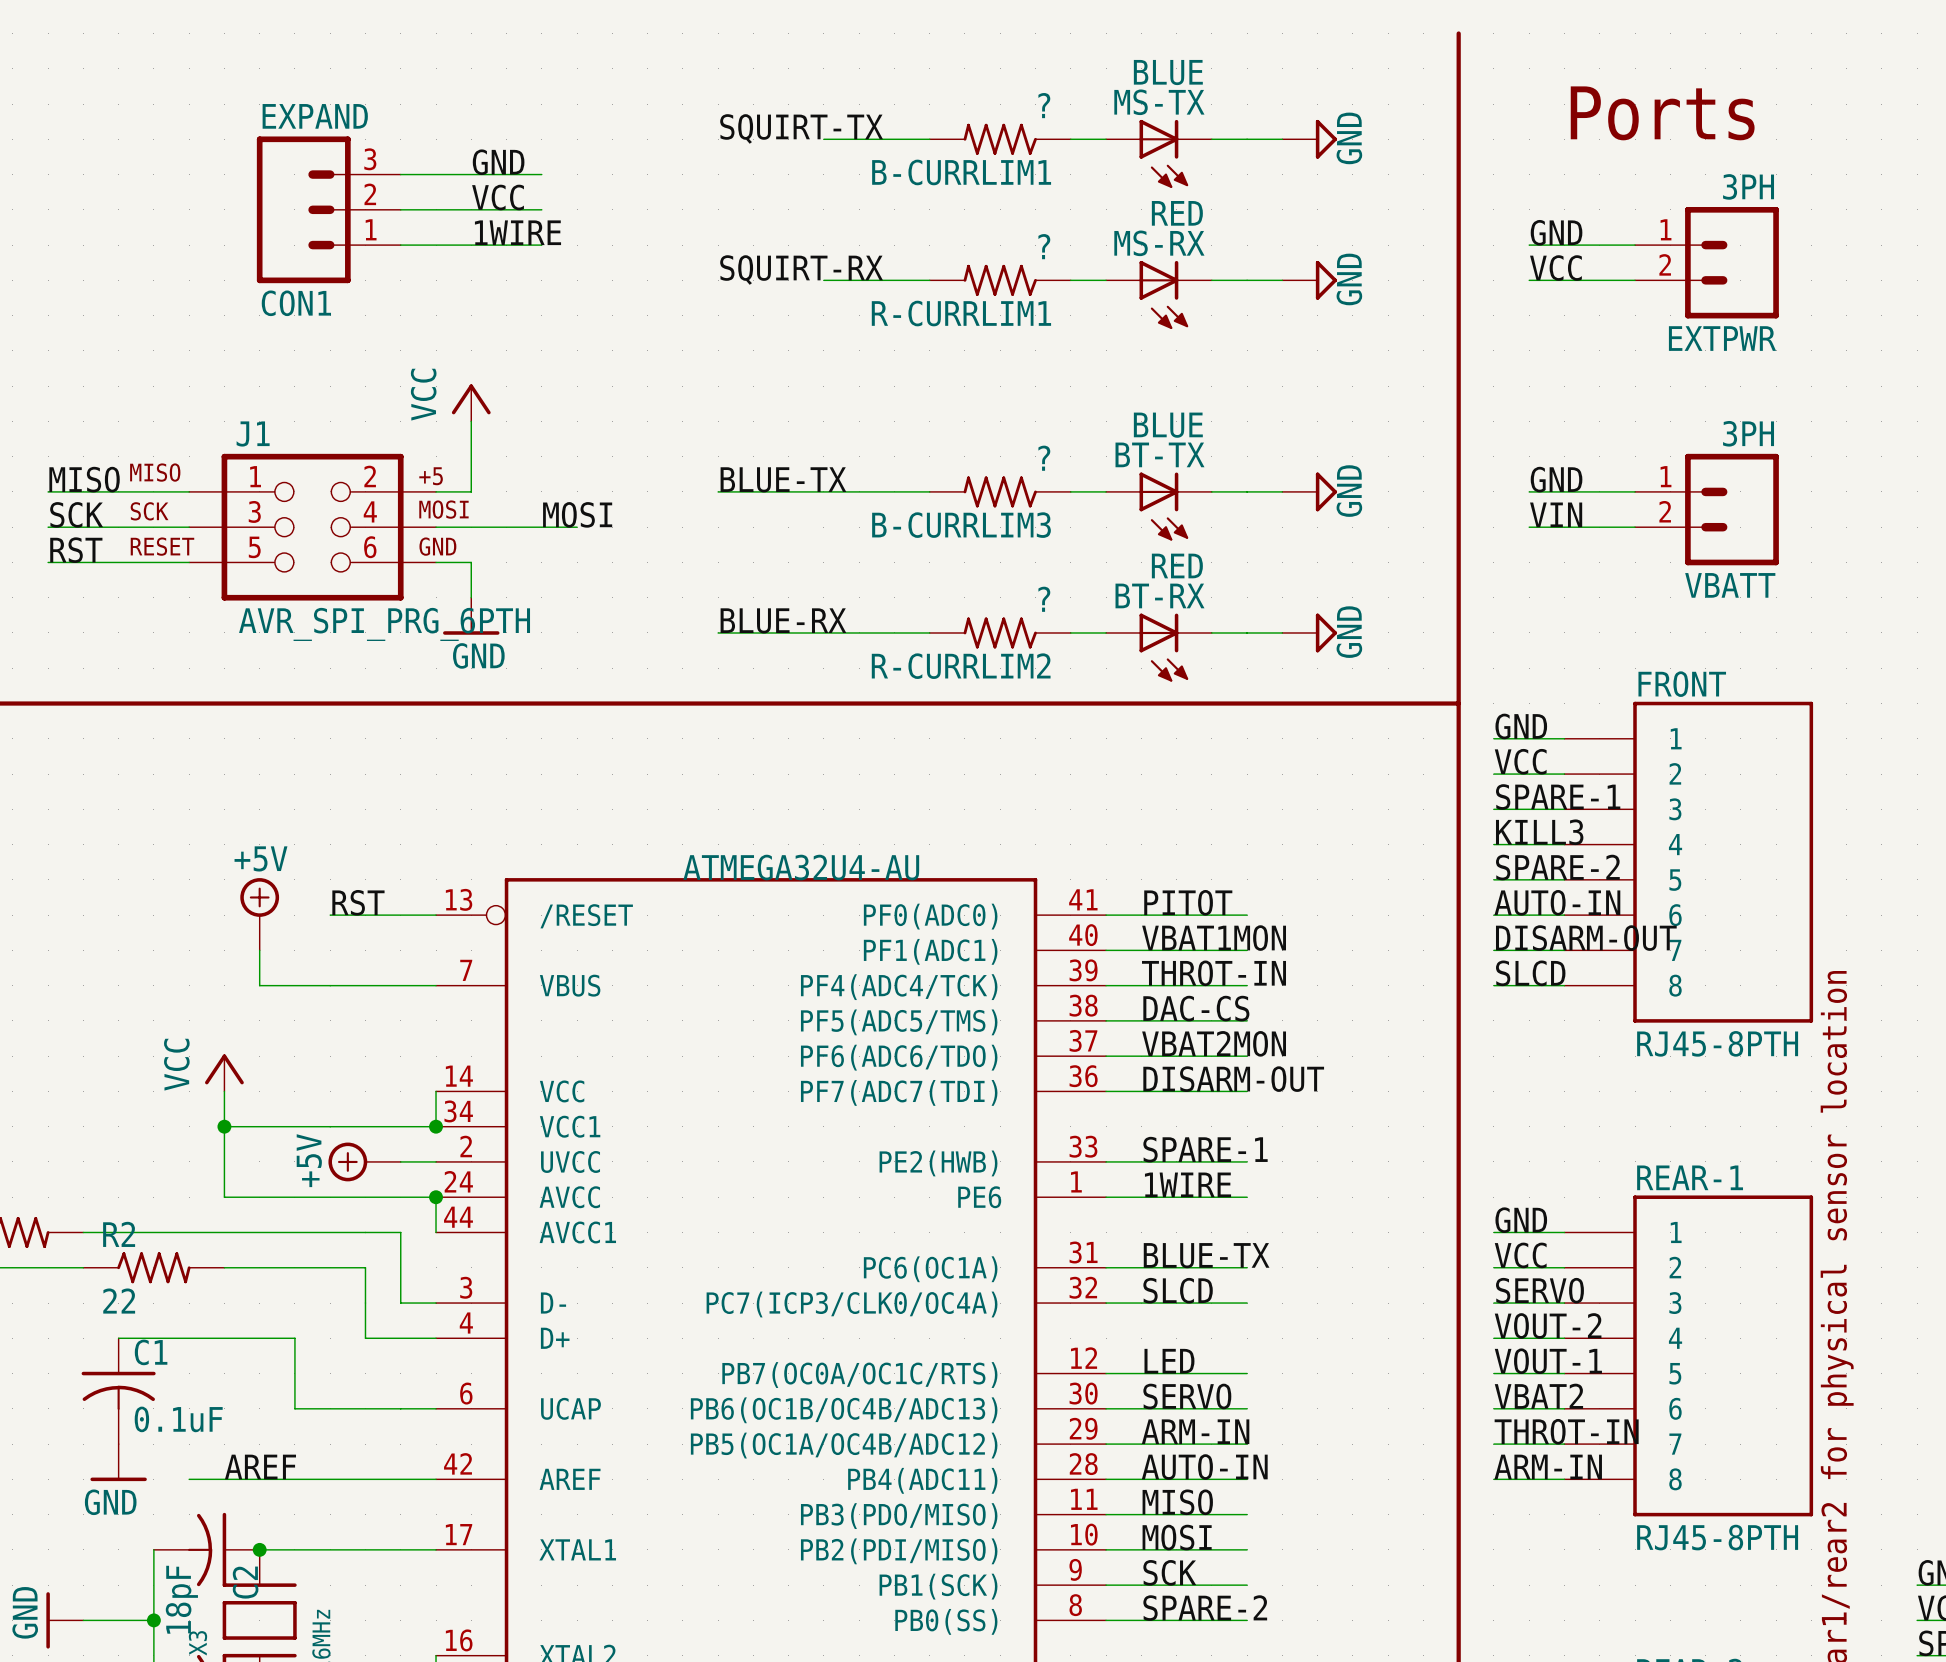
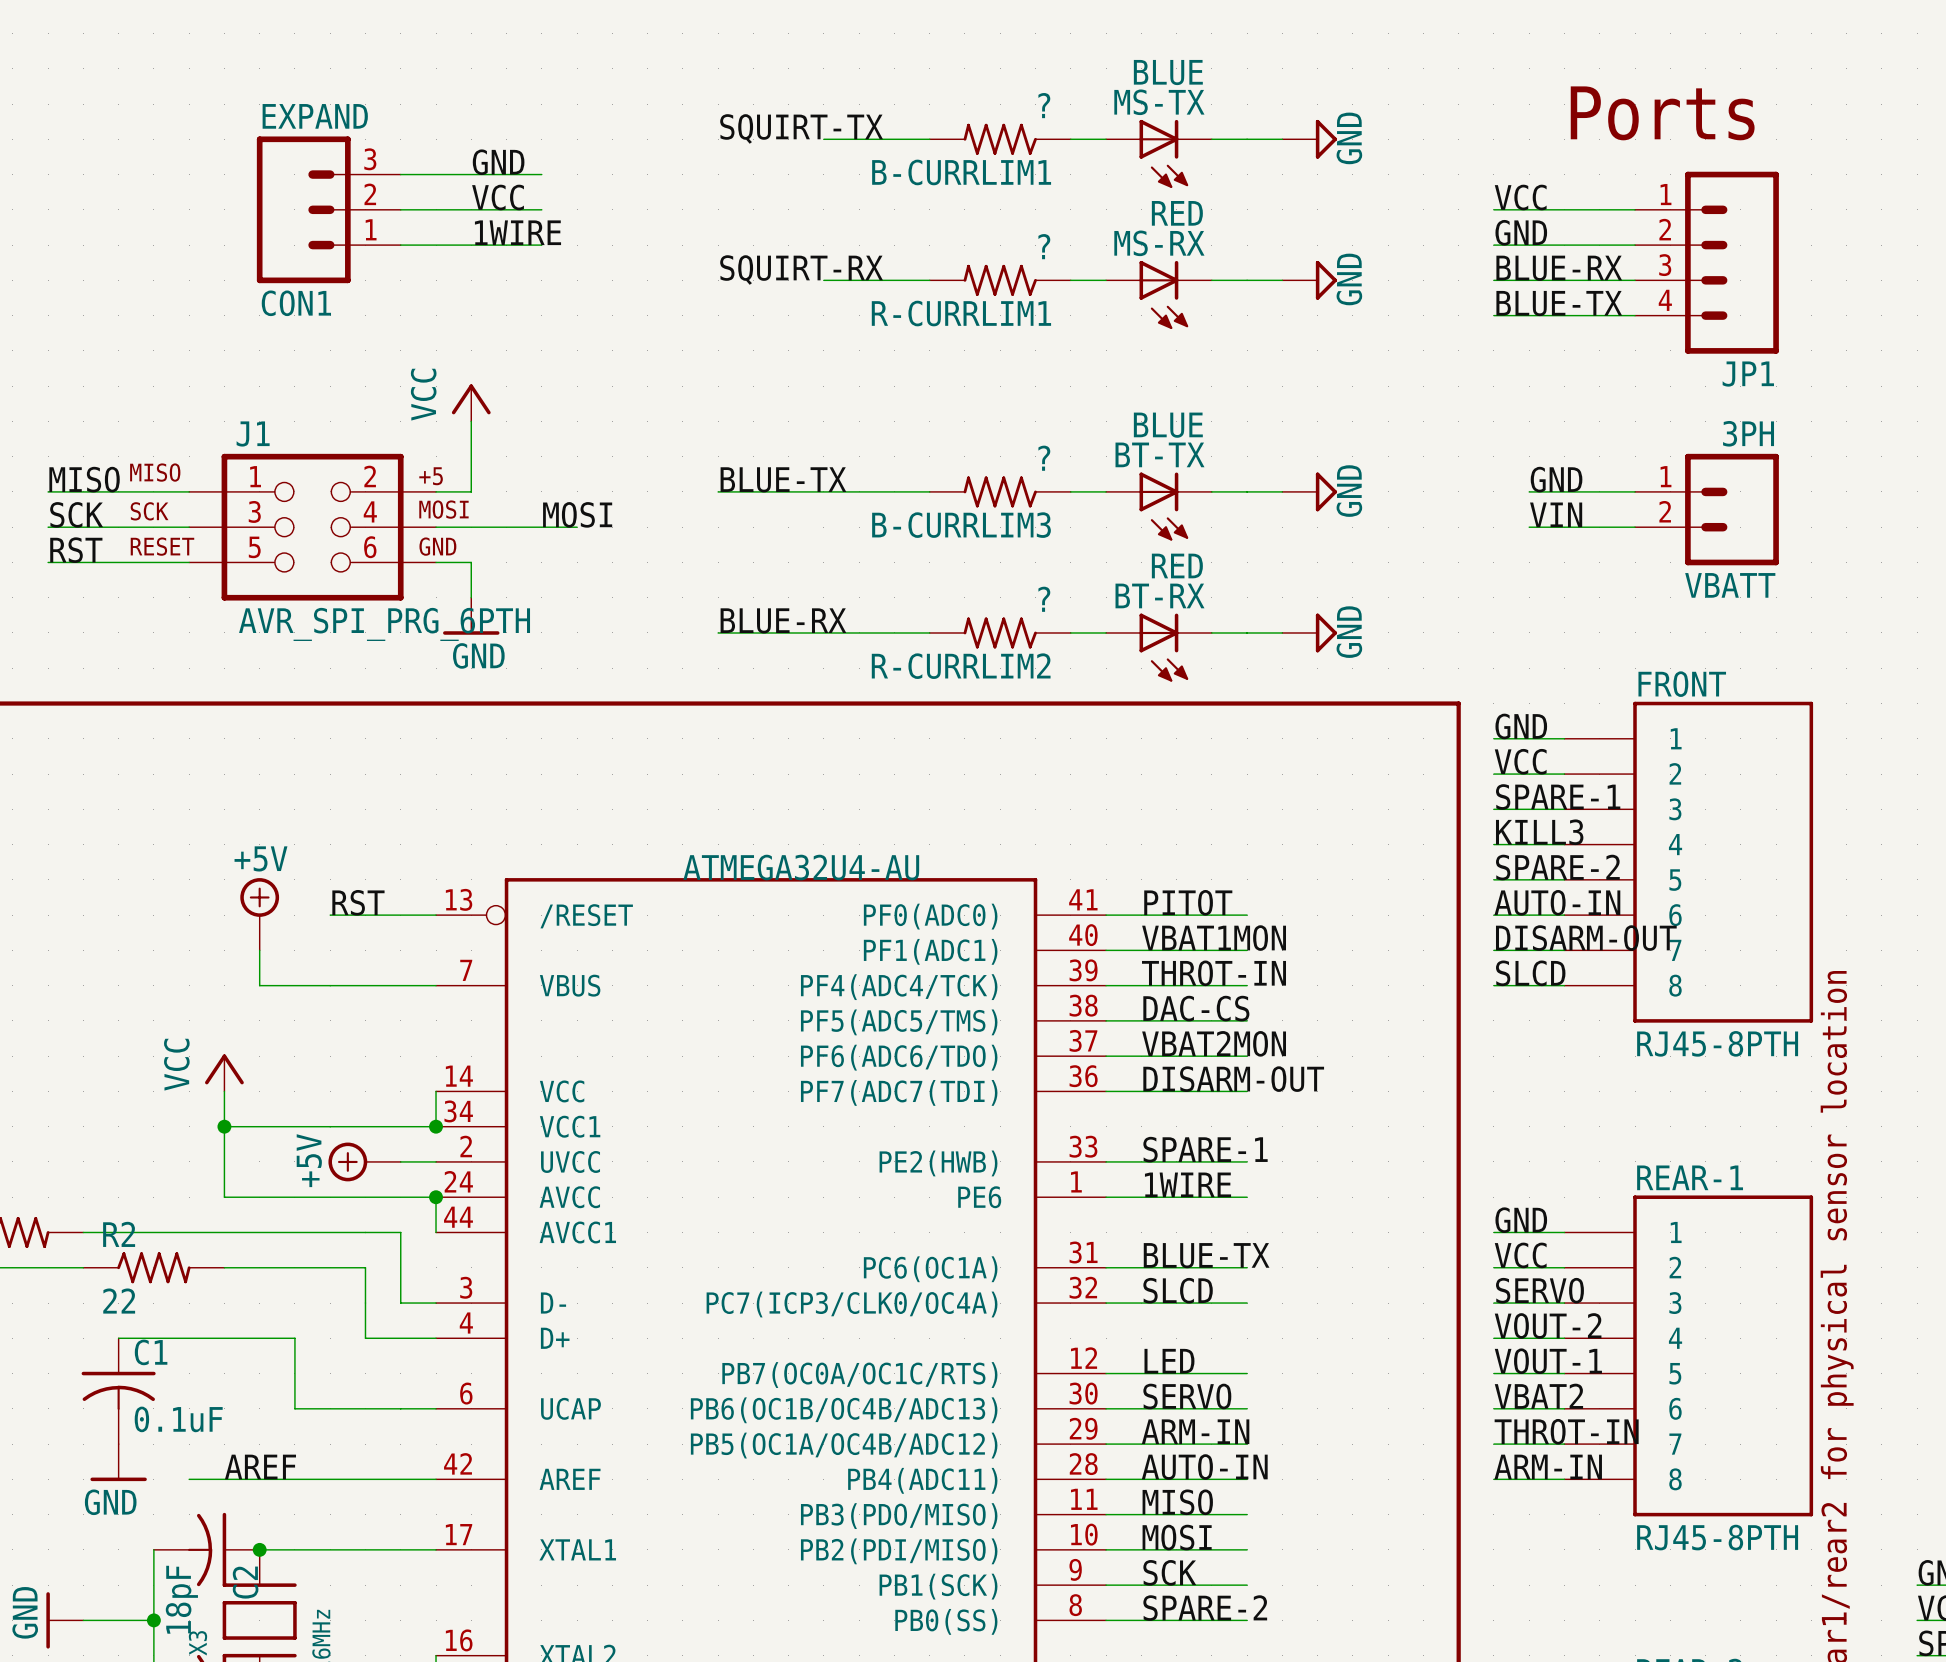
line: (1458, 33) (1458, 703) -> none
wire: none -> (1493, 209) (1635, 209)
label position: GND (1556, 232) -> GND (1521, 232)
wire: none -> (1493, 245) (1529, 245)
EXTPWR: 3PH (1706, 262) -> none
JP1: none -> (1706, 262)
label position: VCC (1555, 268) -> VCC (1520, 197)
label: none -> BLUE-RX (1559, 268)
wire: none -> (1493, 280) (1529, 280)
label: none -> BLUE-TX (1559, 303)
wire: none -> (1493, 315) (1635, 315)

